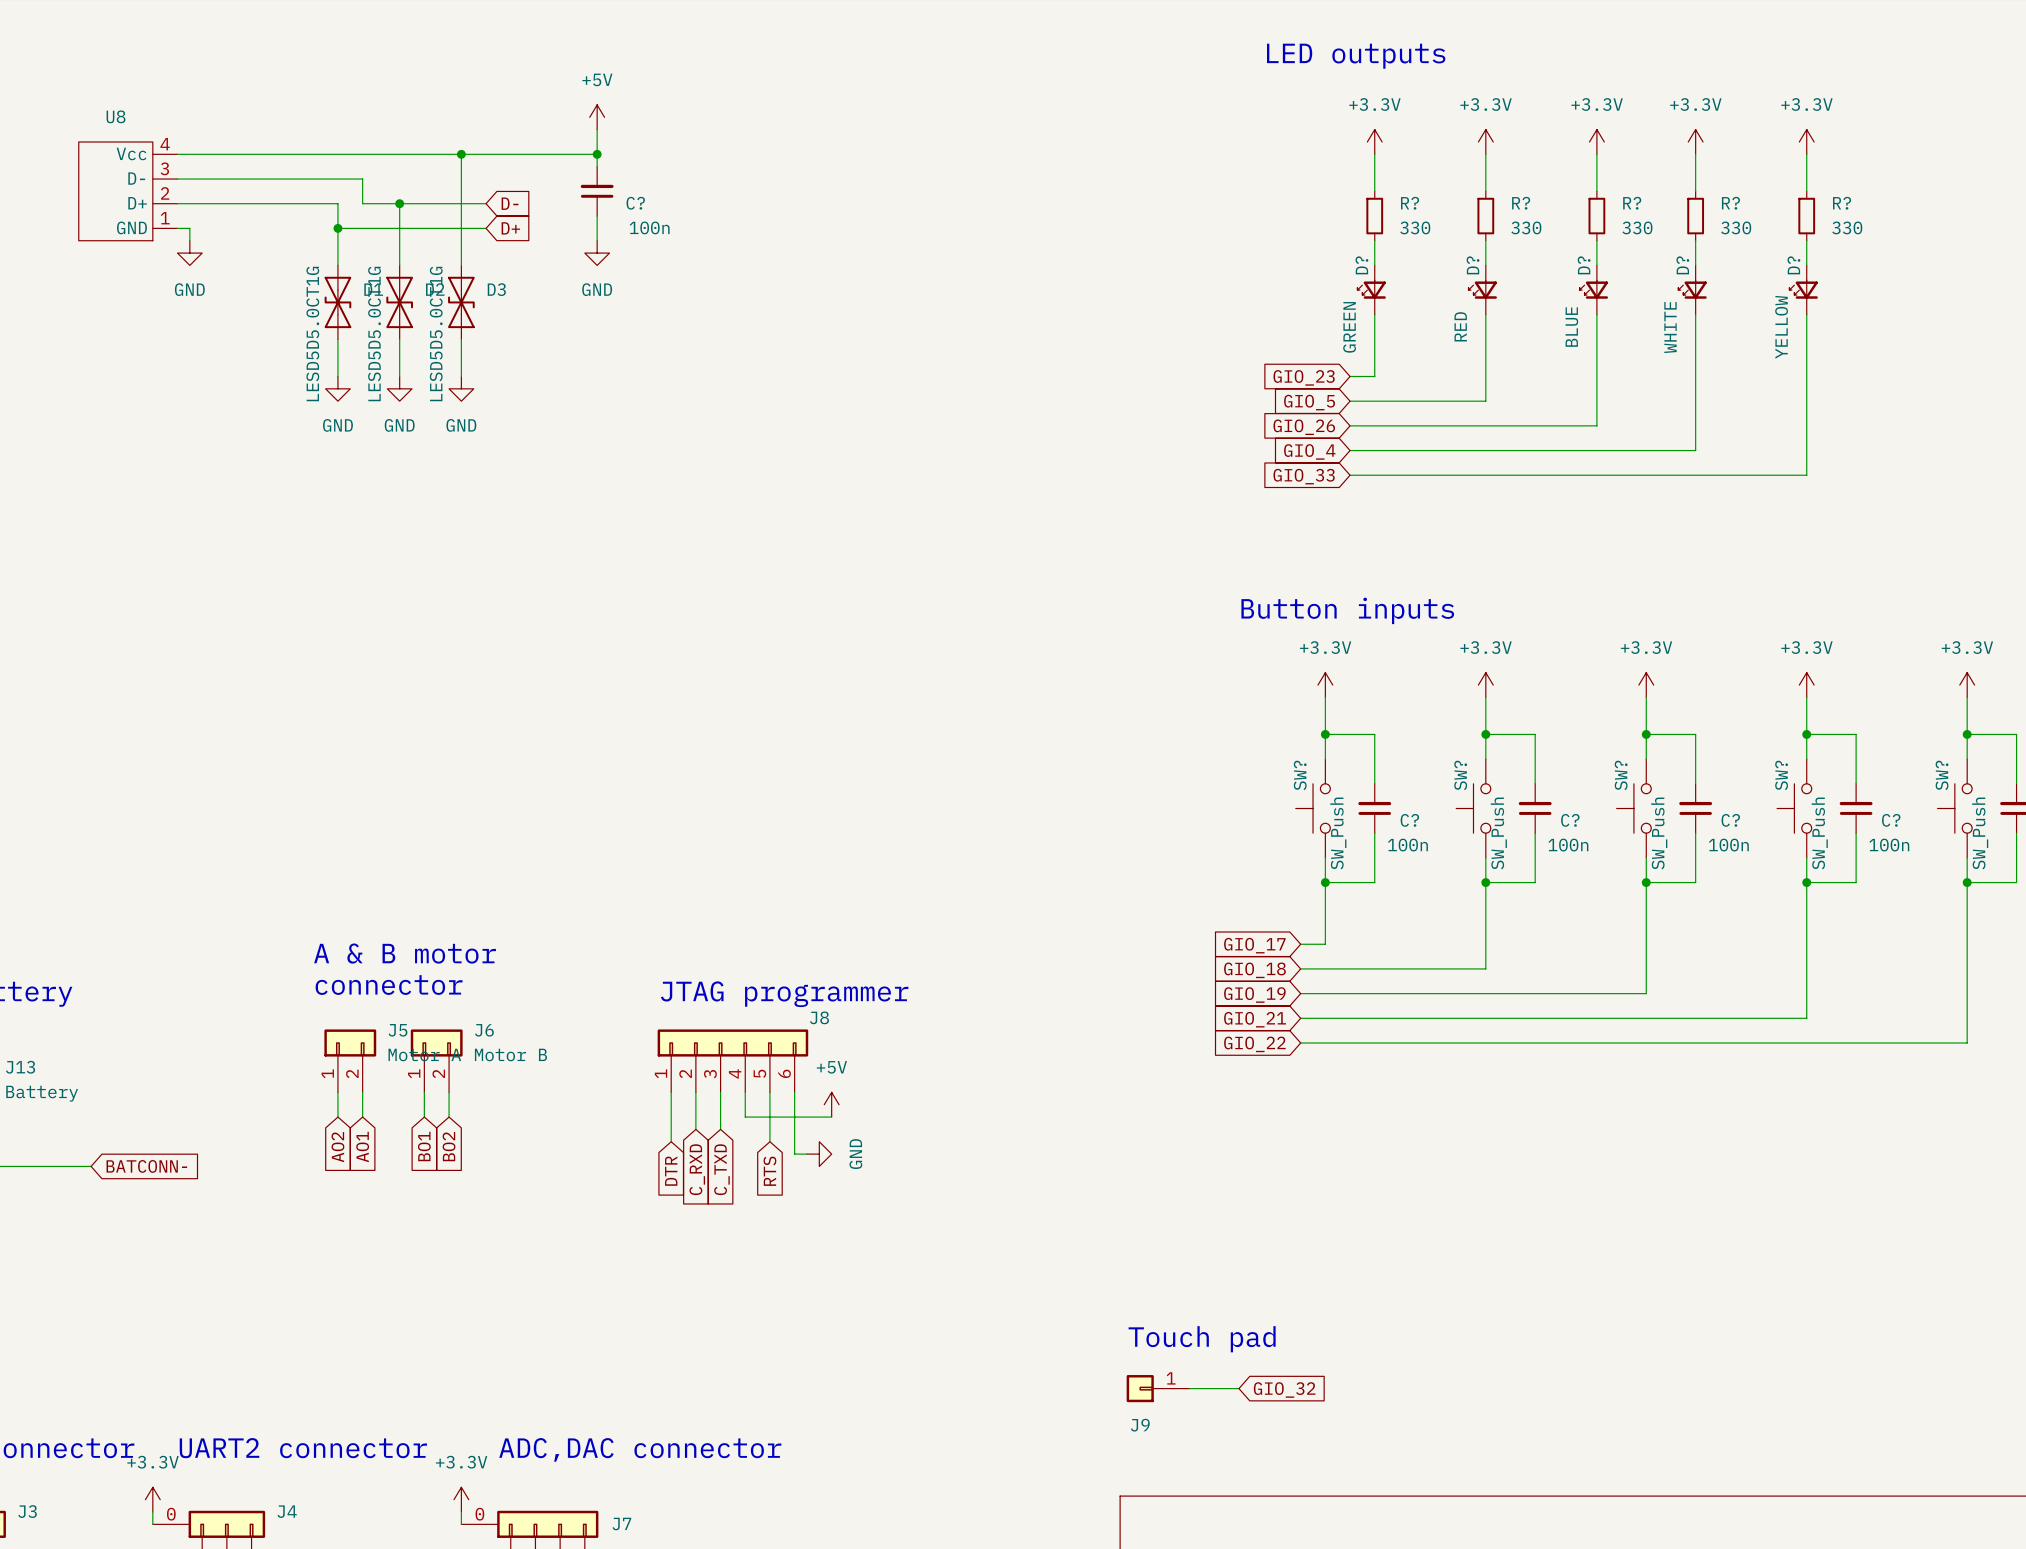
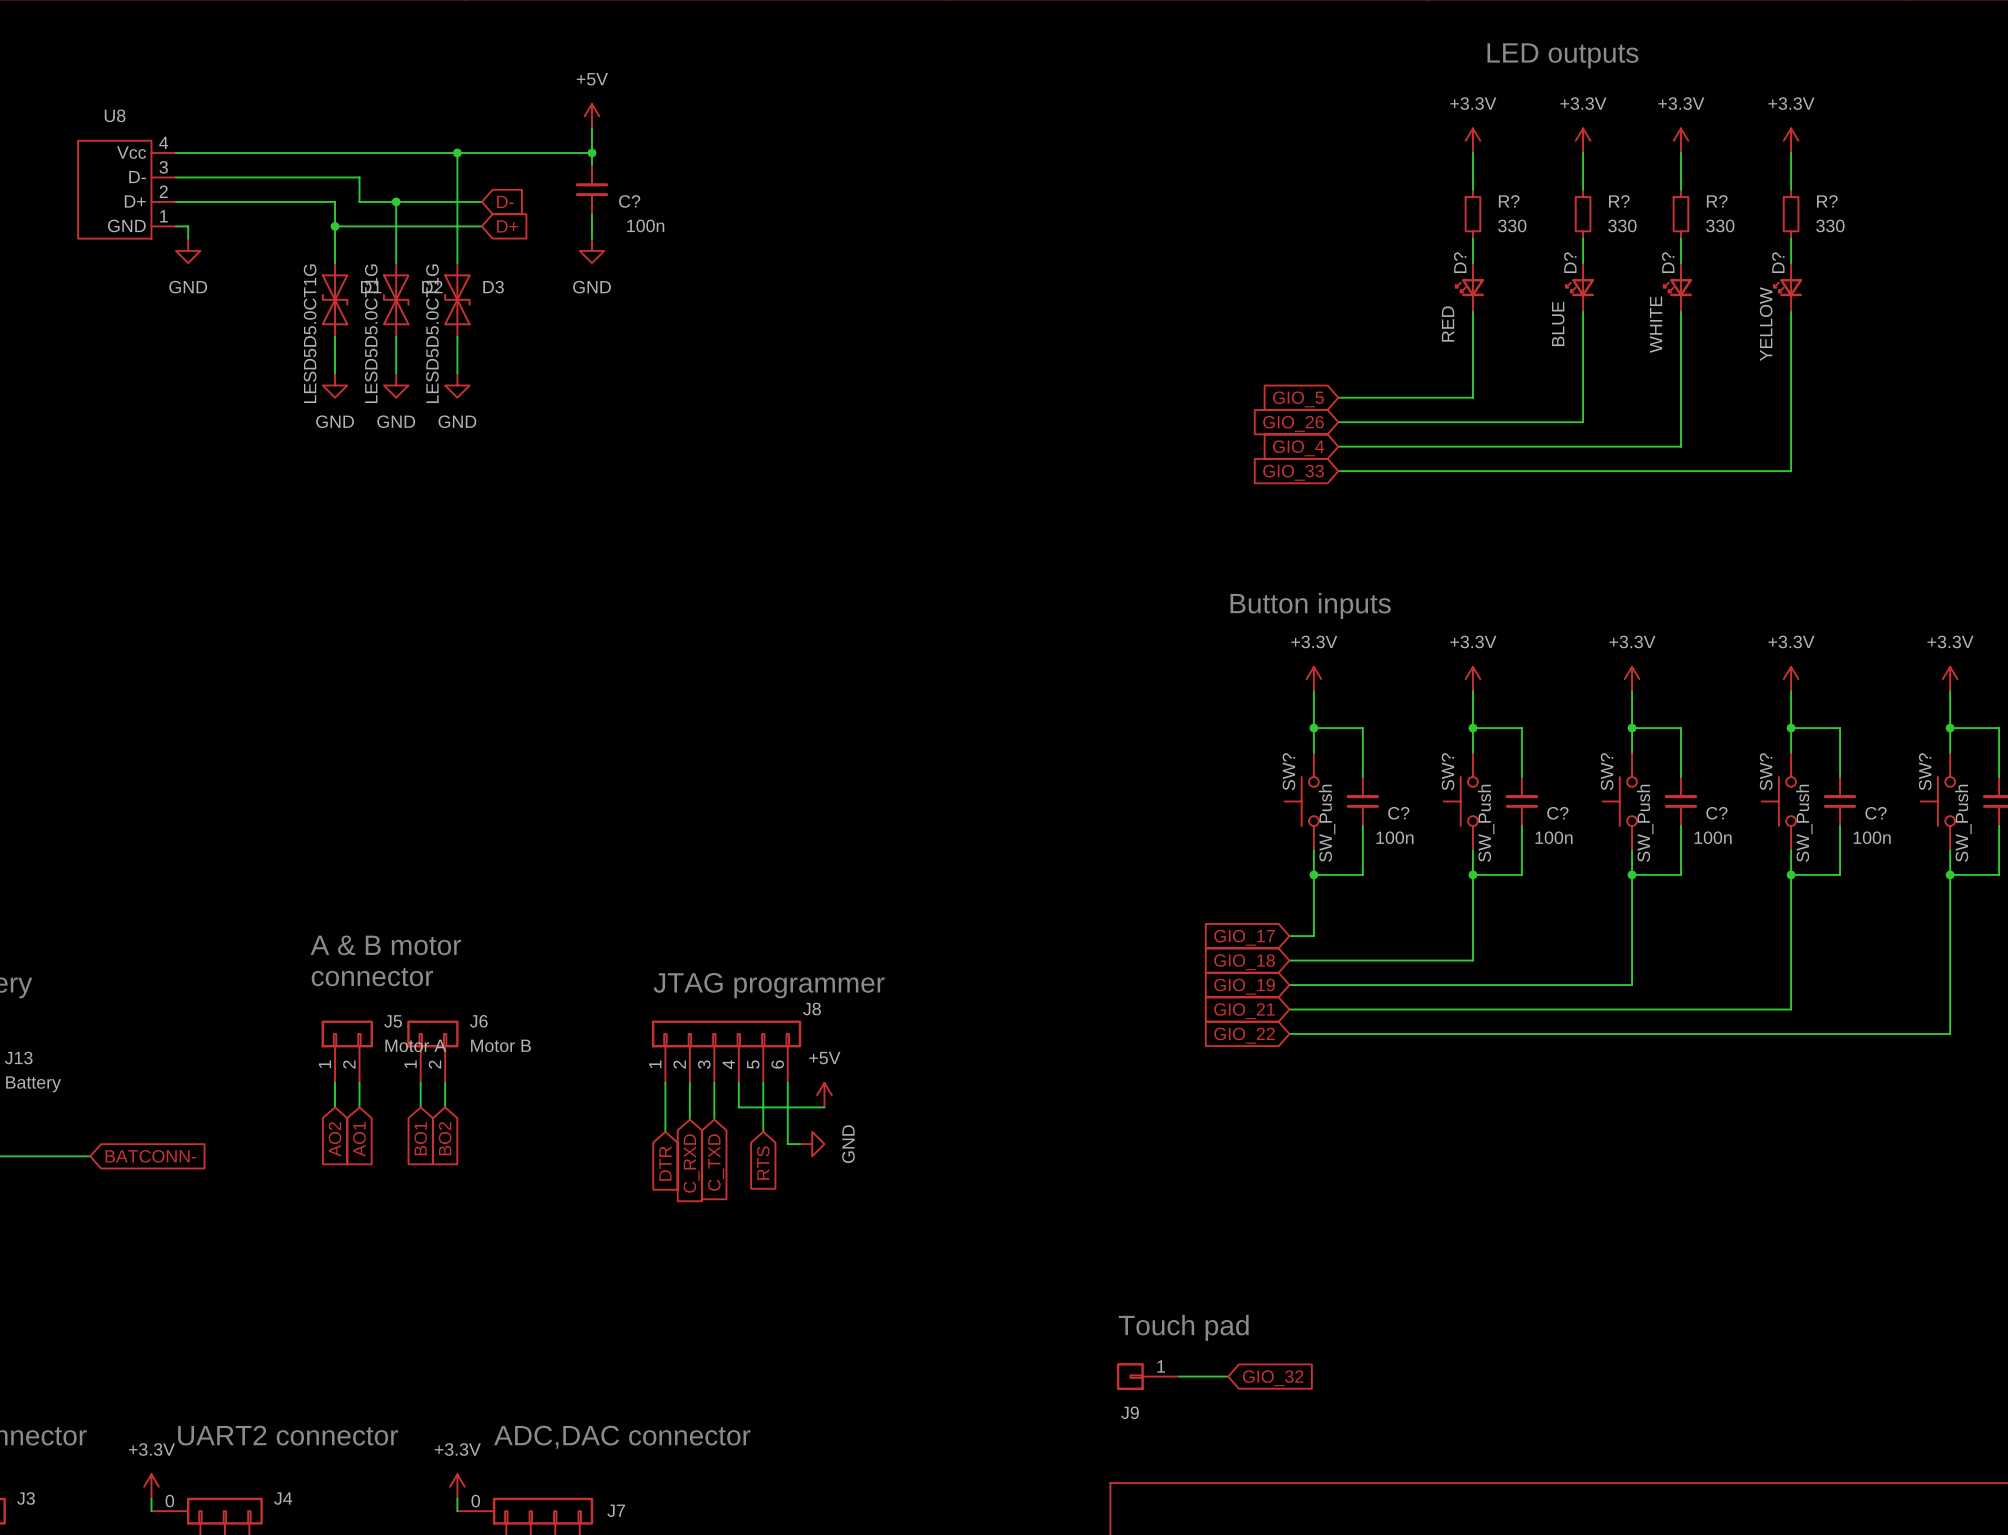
text position: LED outputs (1356, 56) -> LED outputs (1562, 55)
power symbol: +3.3V (1374, 141) -> none
wire: (1374, 154) (1374, 191) -> none
R?: 330 (1374, 216) -> none
wire: (1374, 240) (1374, 265) -> none
D?: GREEN (1371, 290) -> none
wire: (1374, 314) (1374, 376) (1350, 376) -> none
global label: GIO_23 (1304, 377) -> none

